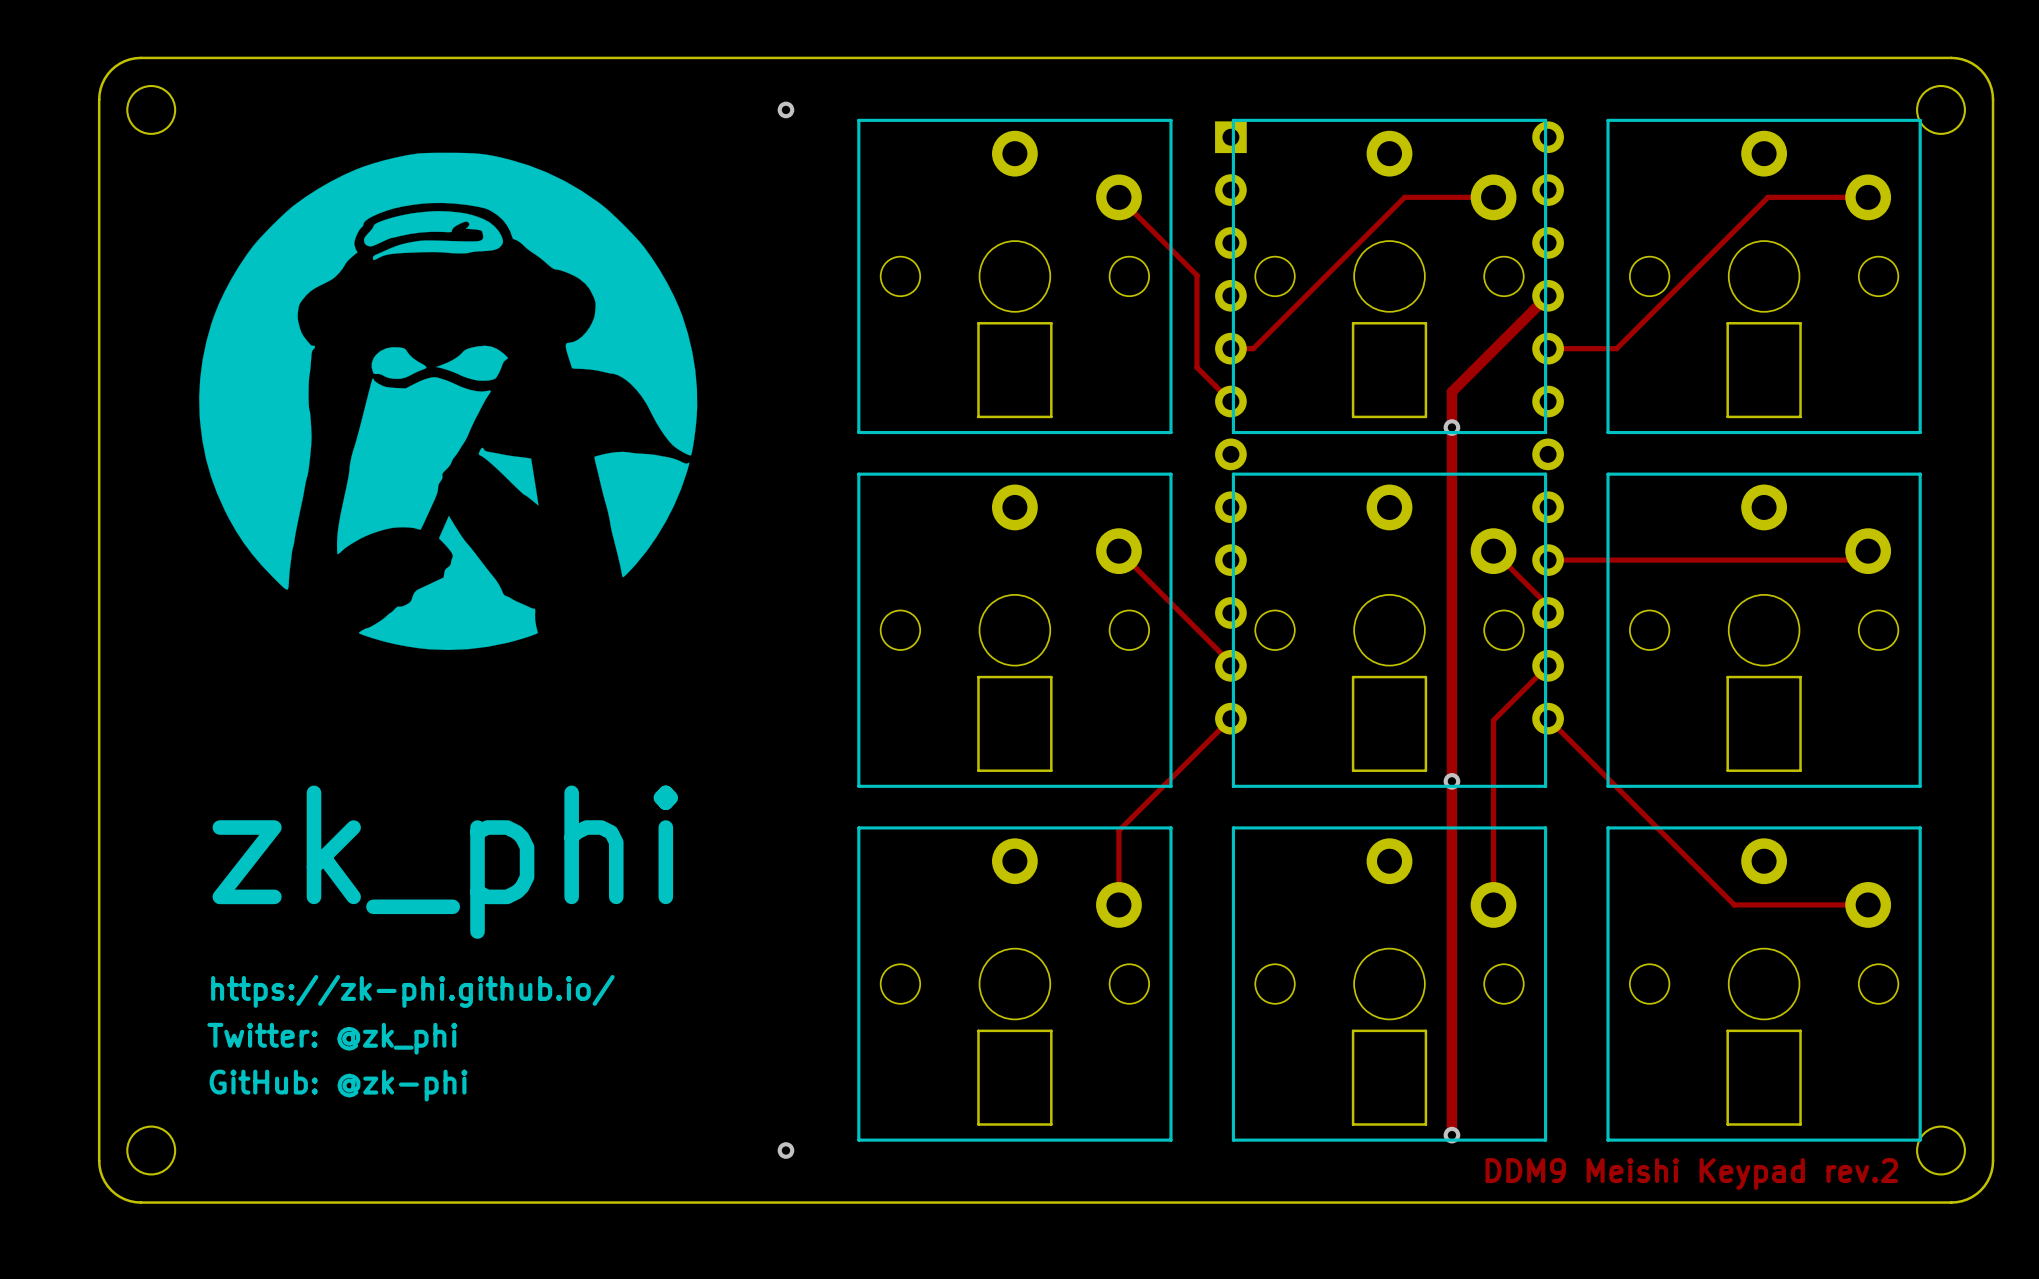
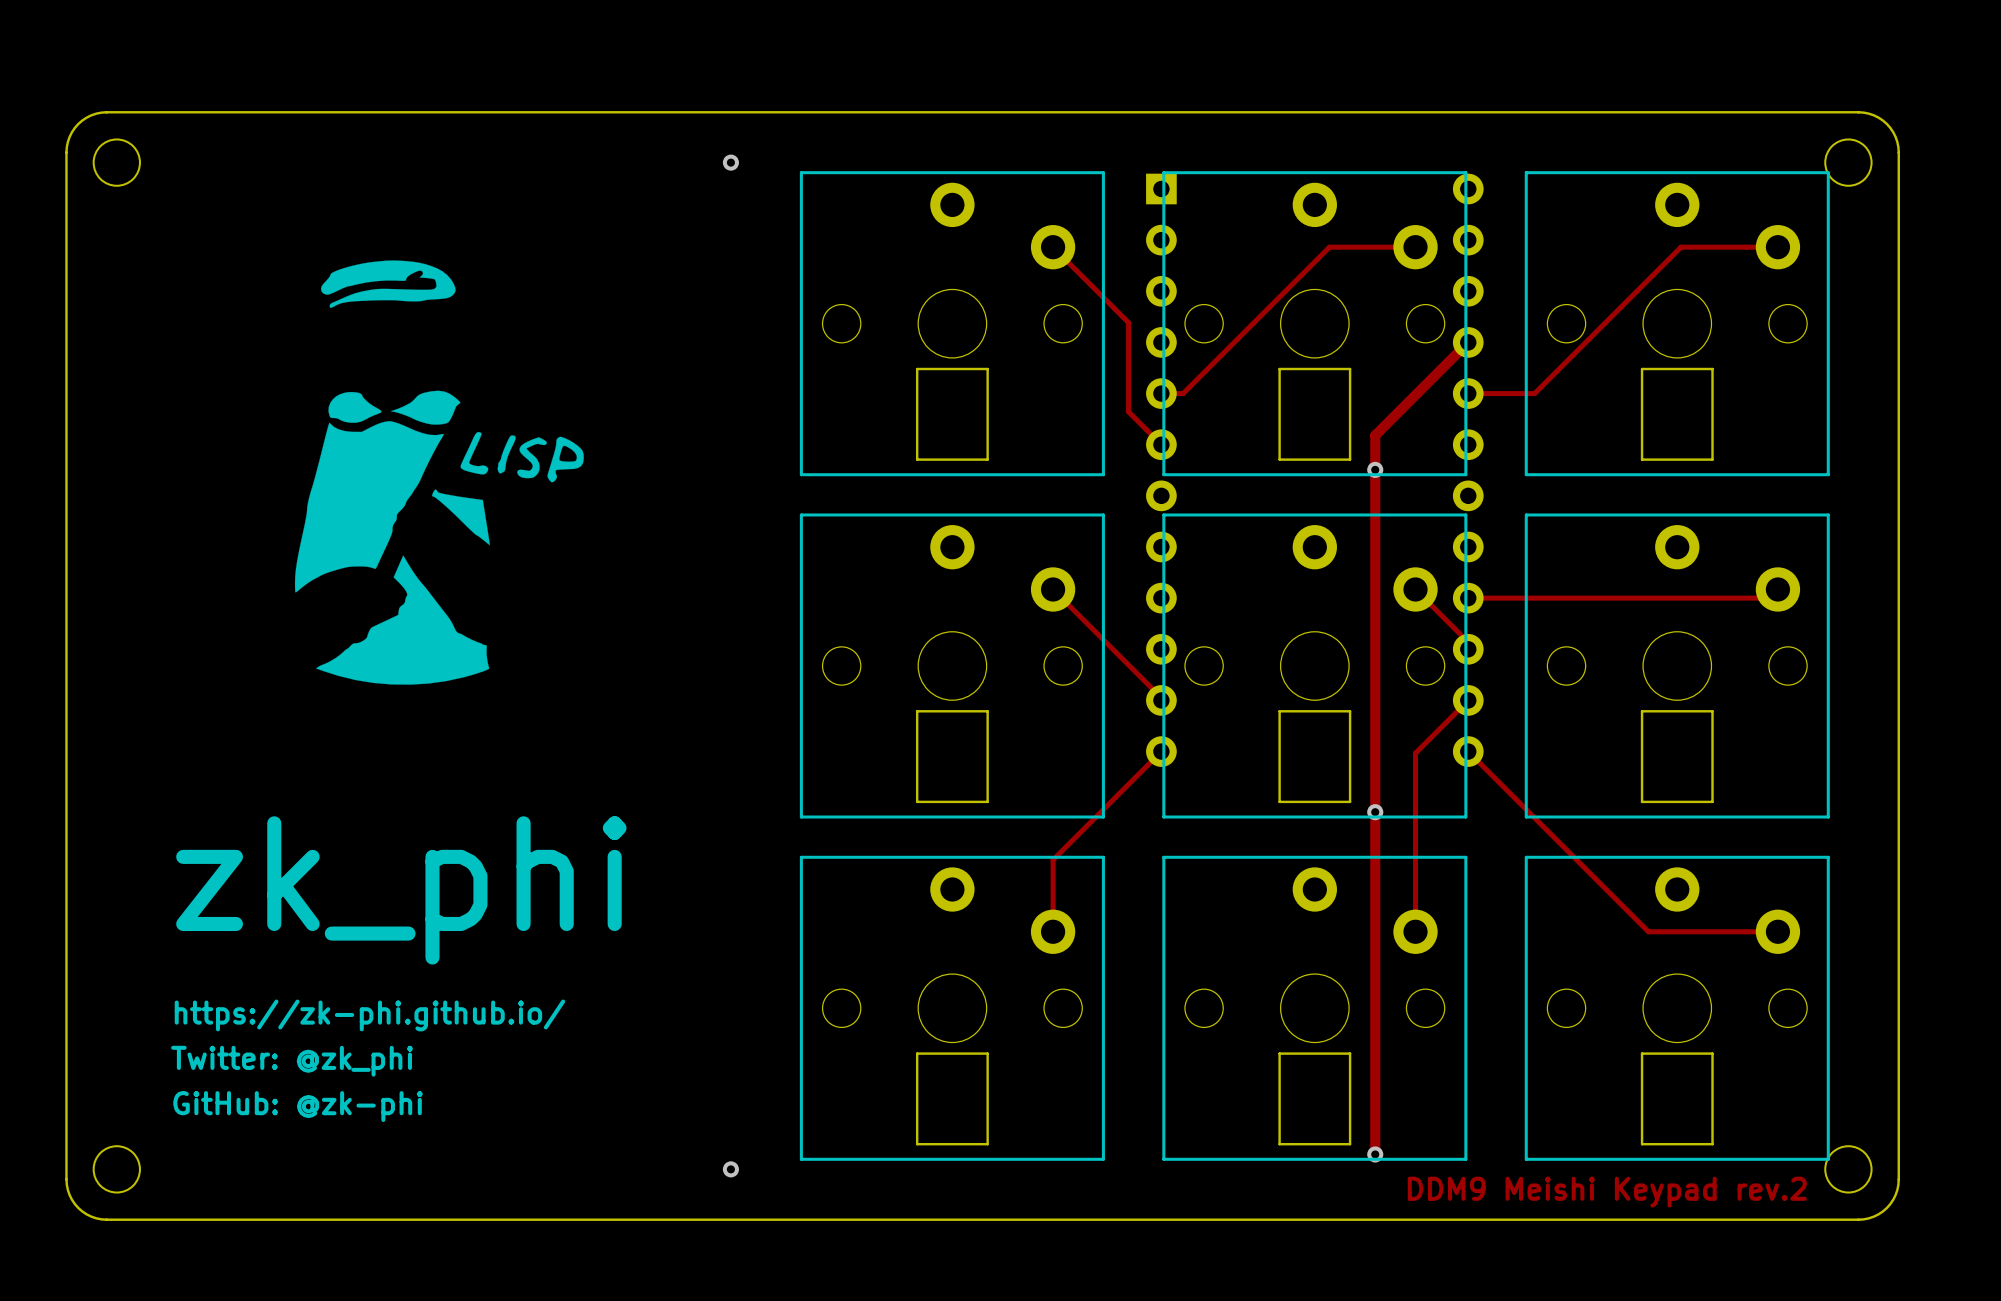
drawing: [199, 152, 698, 651] -> none
drawing: none -> [294, 260, 584, 685]

